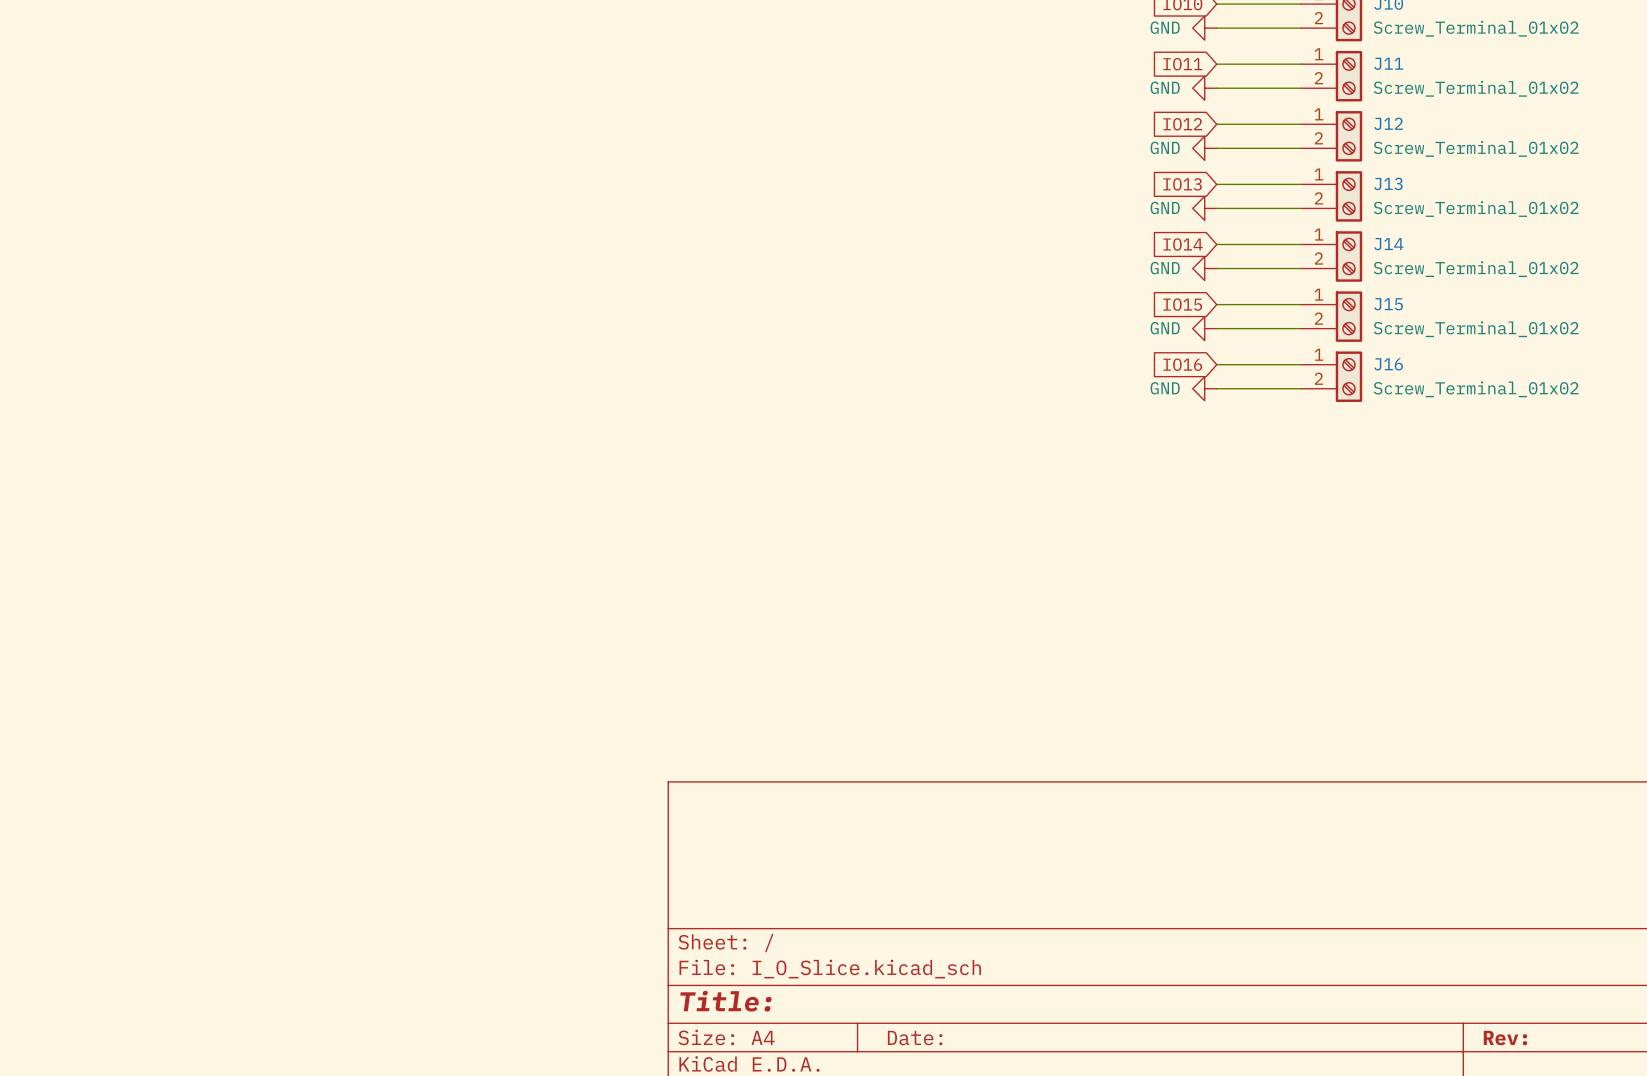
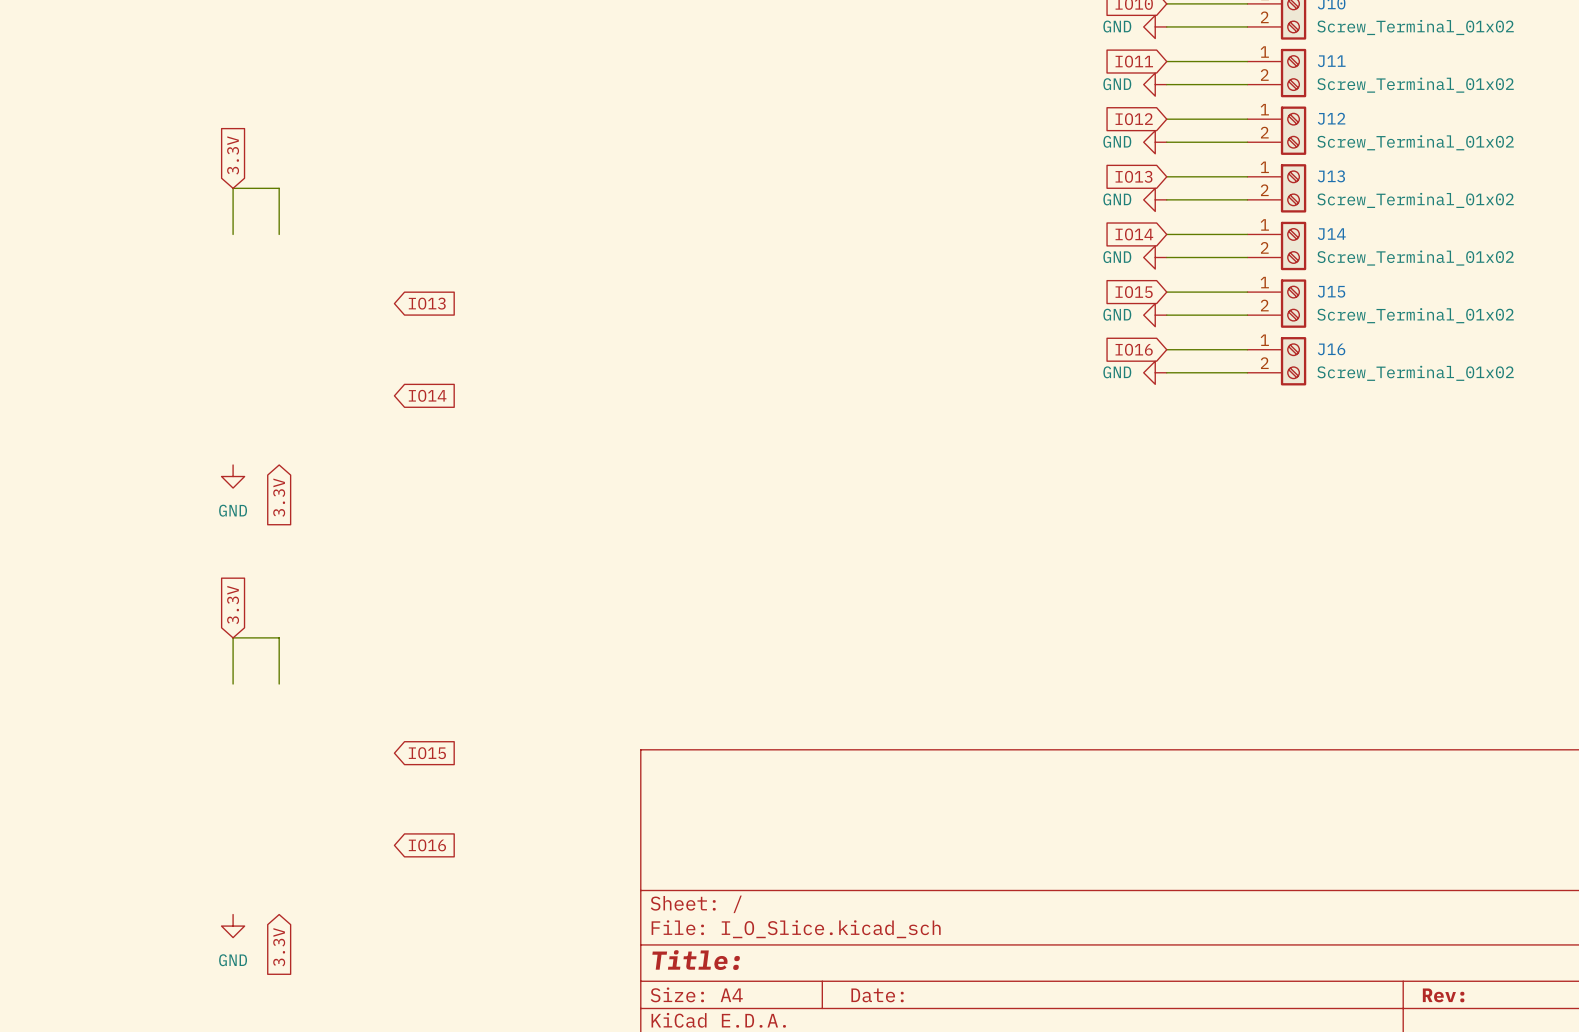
global label: none -> 3.3V (233, 155)
wire: none -> (233, 234) (233, 188) (279, 188) (279, 234)
global label: none -> IO13 (427, 303)
global label: none -> IO14 (427, 395)
power symbol: none -> GND (233, 476)
global label: none -> 3.3V (279, 497)
global label: none -> 3.3V (233, 605)
wire: none -> (233, 684) (233, 637) (279, 637) (279, 684)
global label: none -> IO15 (427, 753)
global label: none -> IO16 (427, 845)
power symbol: none -> GND (233, 926)
global label: none -> 3.3V (279, 947)

